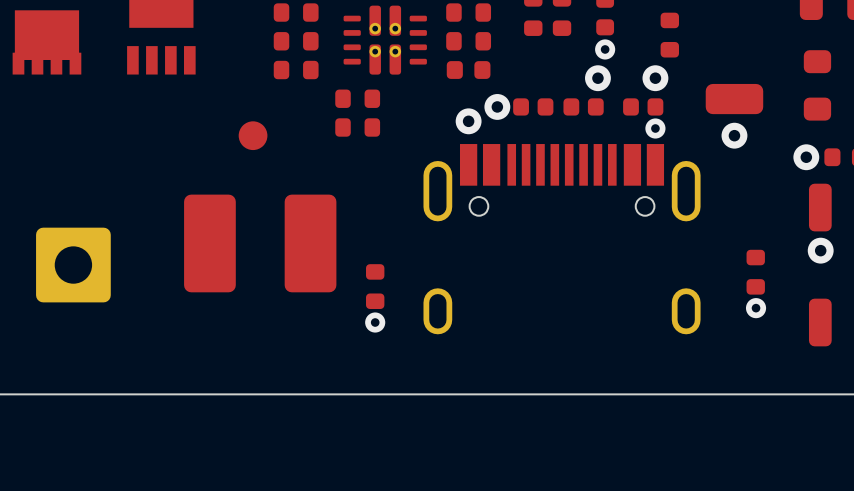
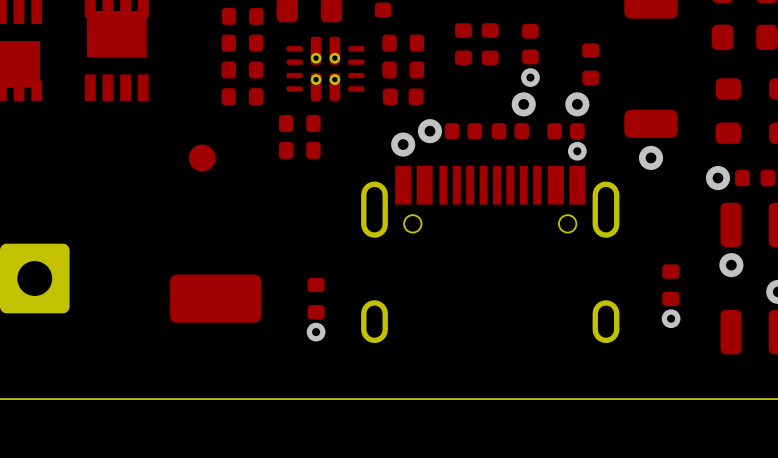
part: (209, 243) -> none
part: (310, 243) -> none
part: none -> (215, 298)

